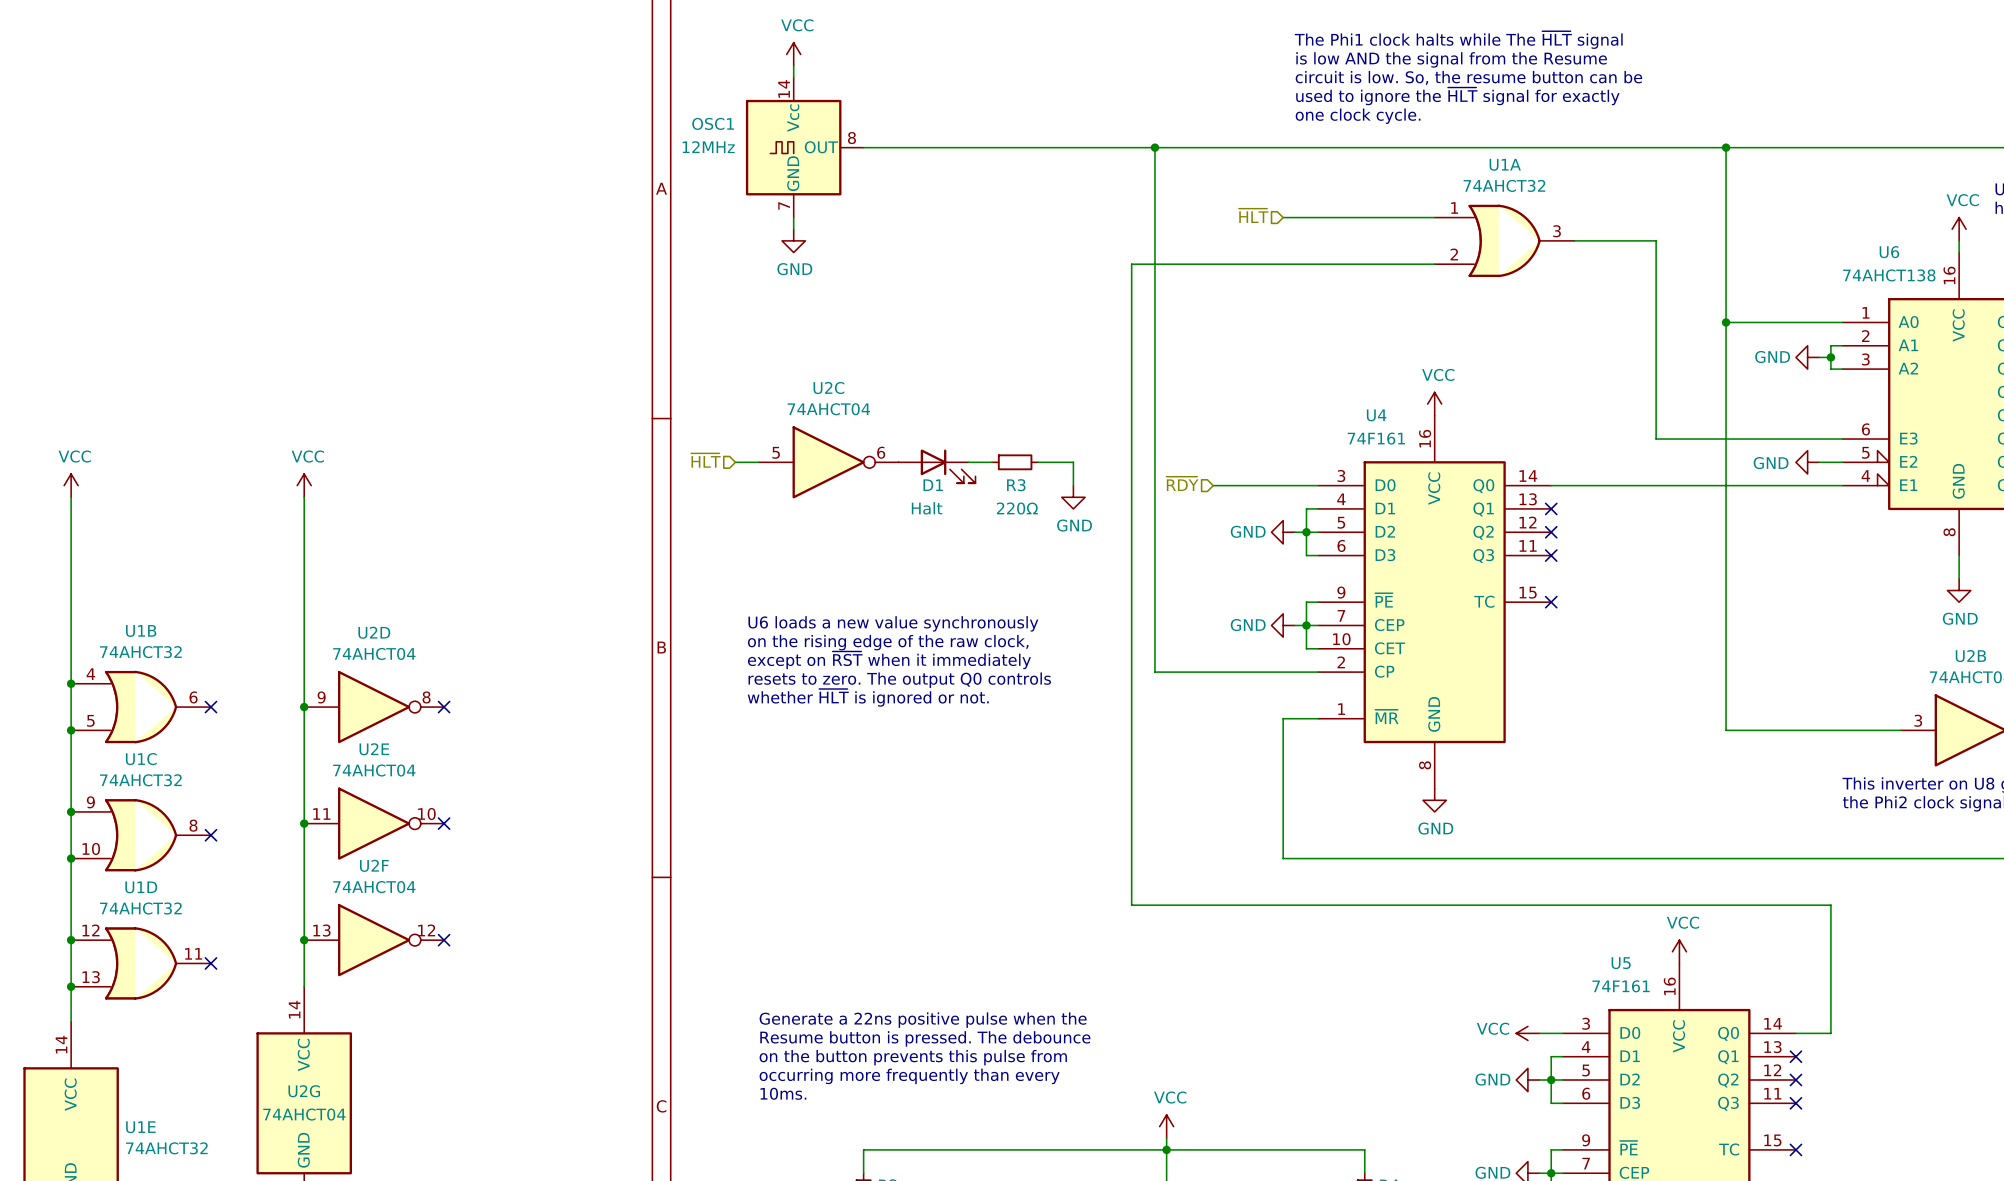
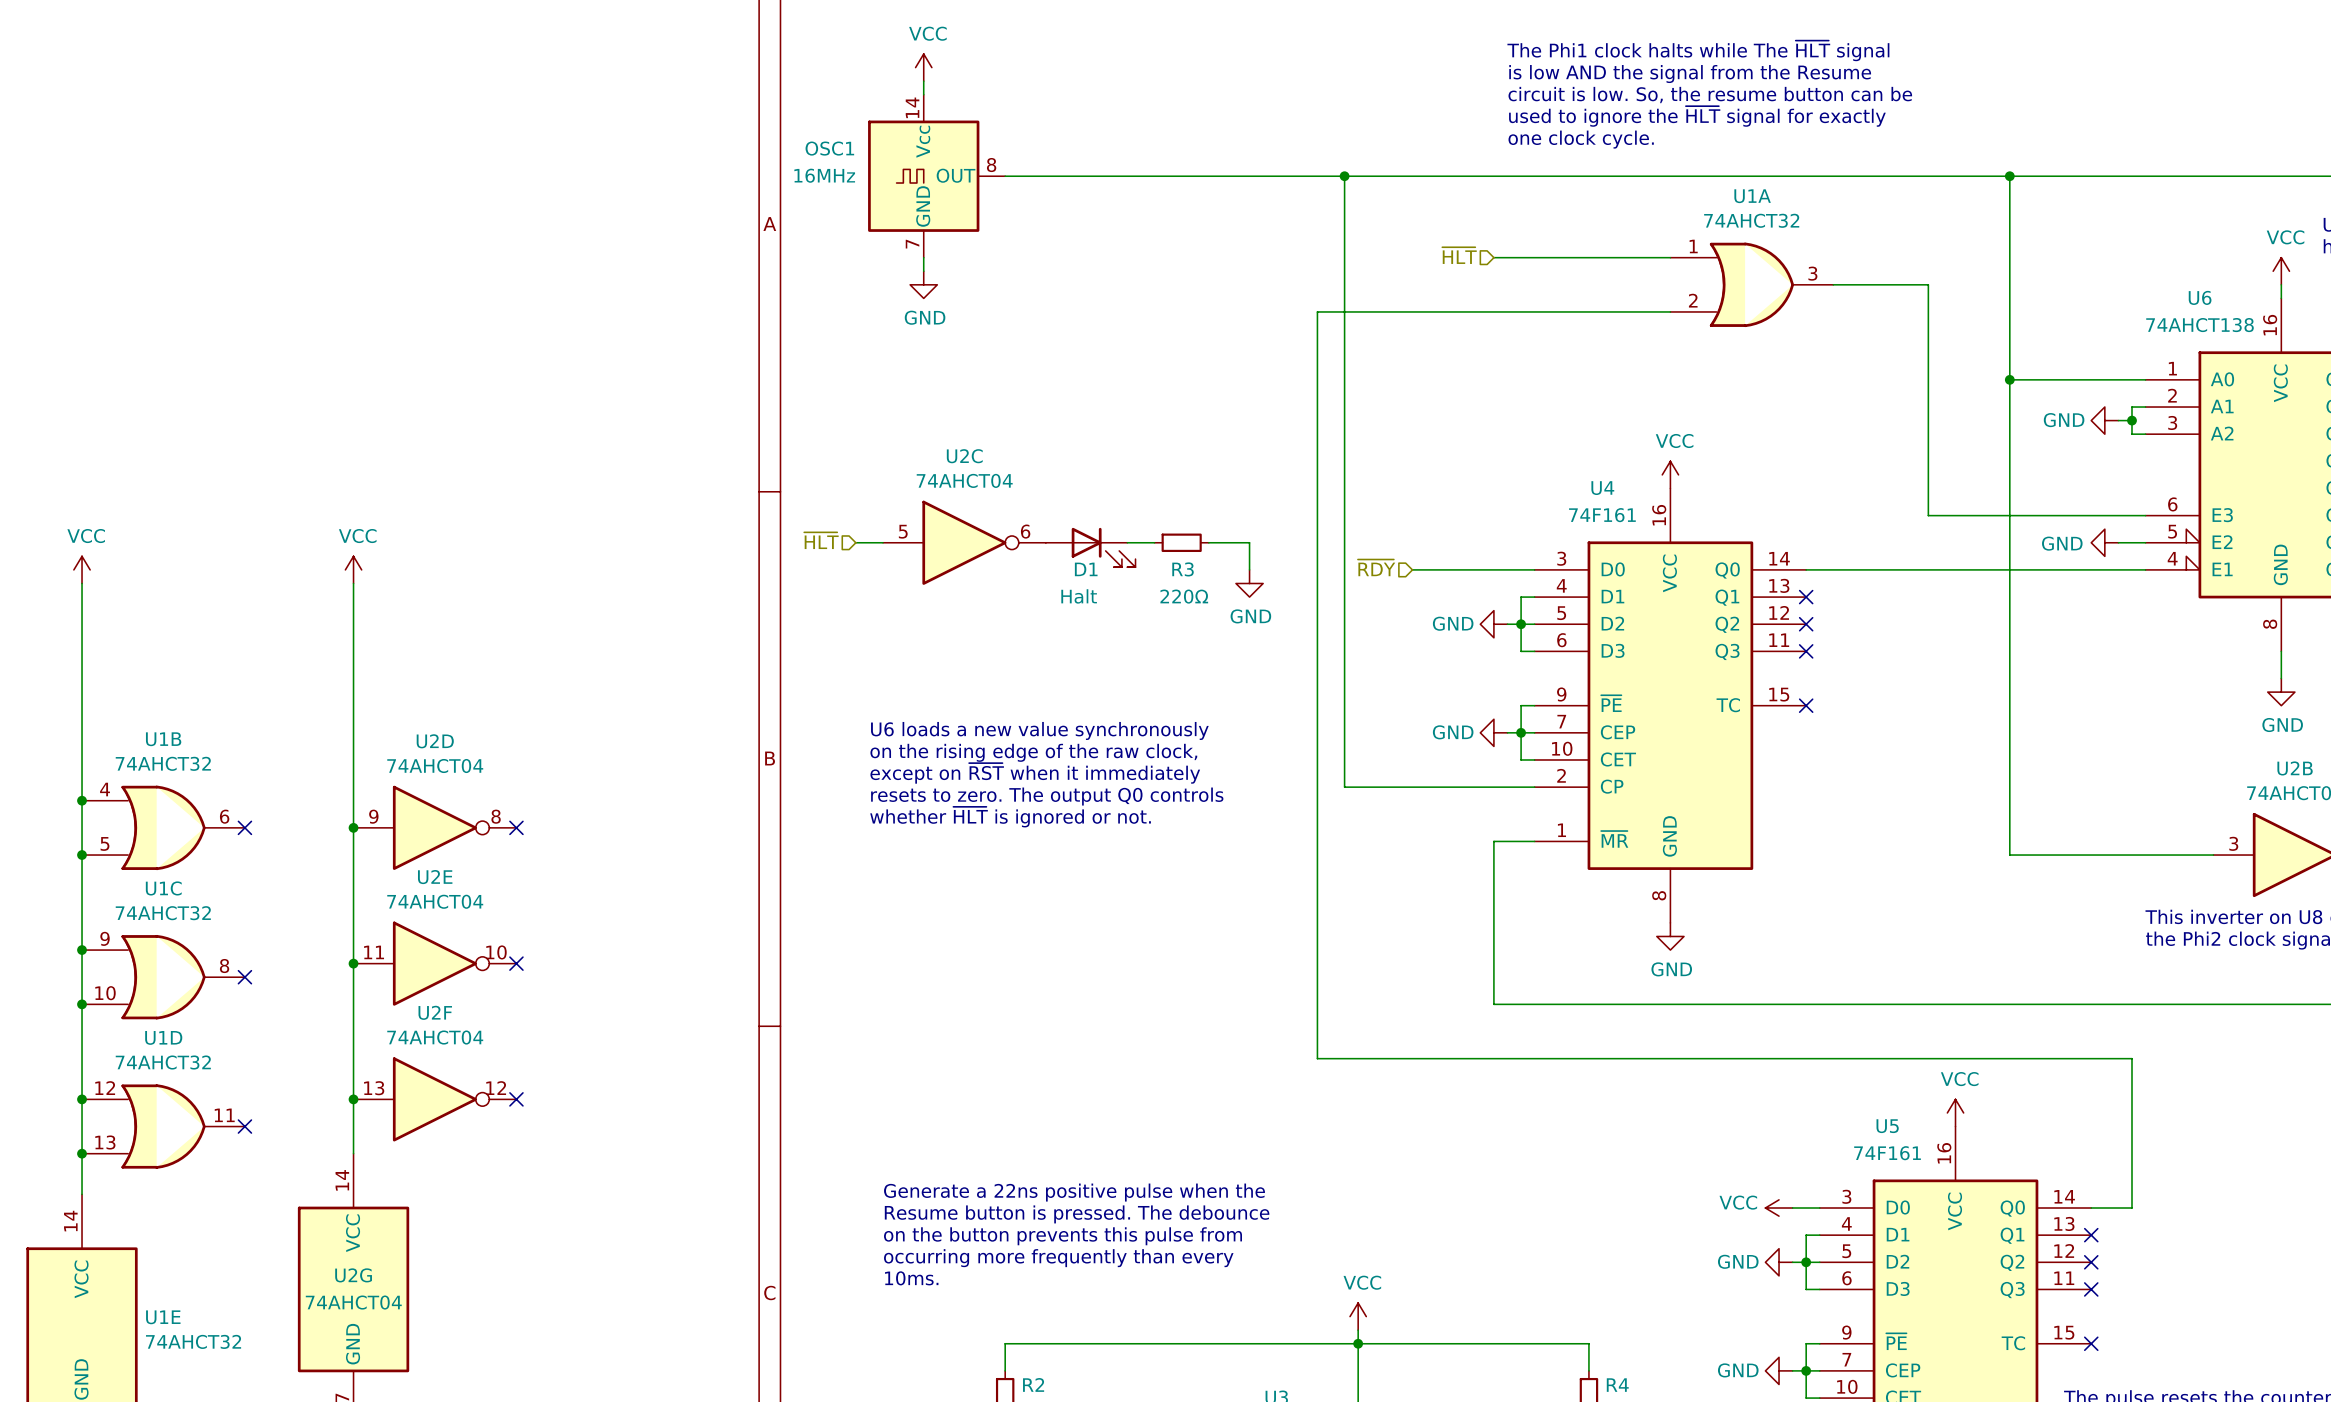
OSC1 value: 12MHz (708, 147) -> 16MHz (824, 175)

